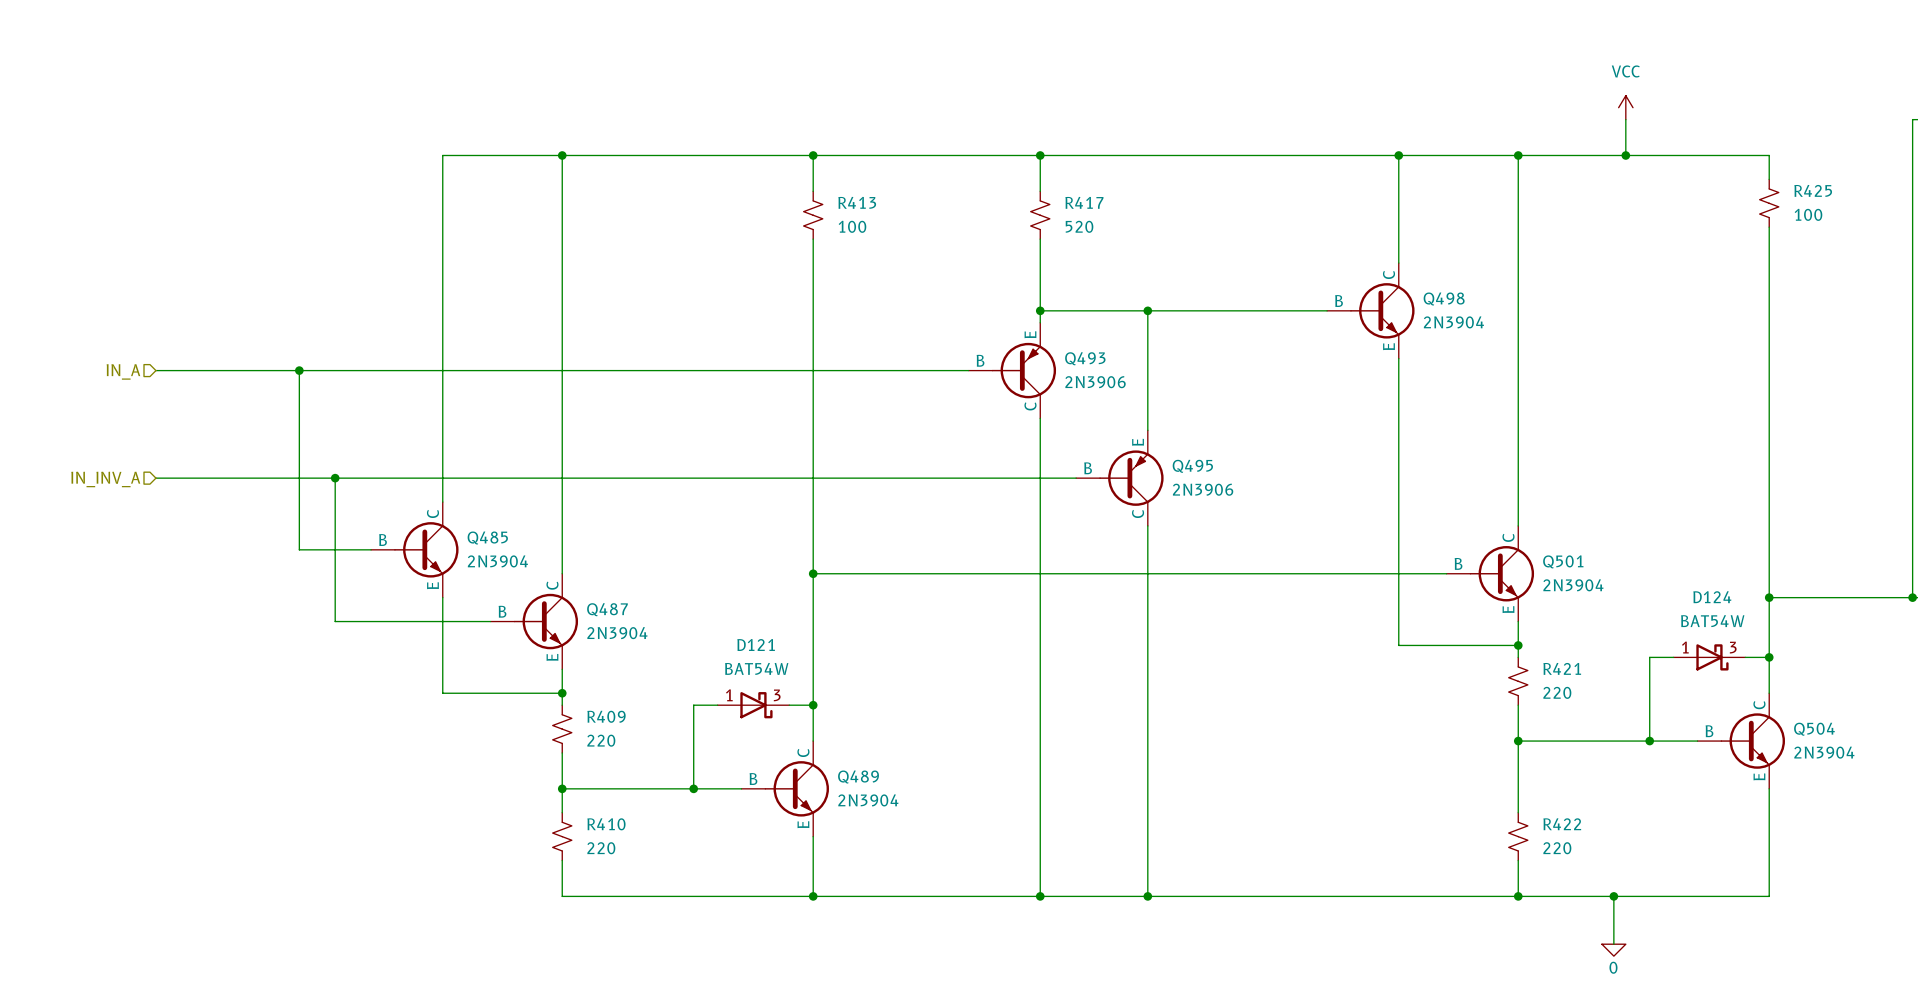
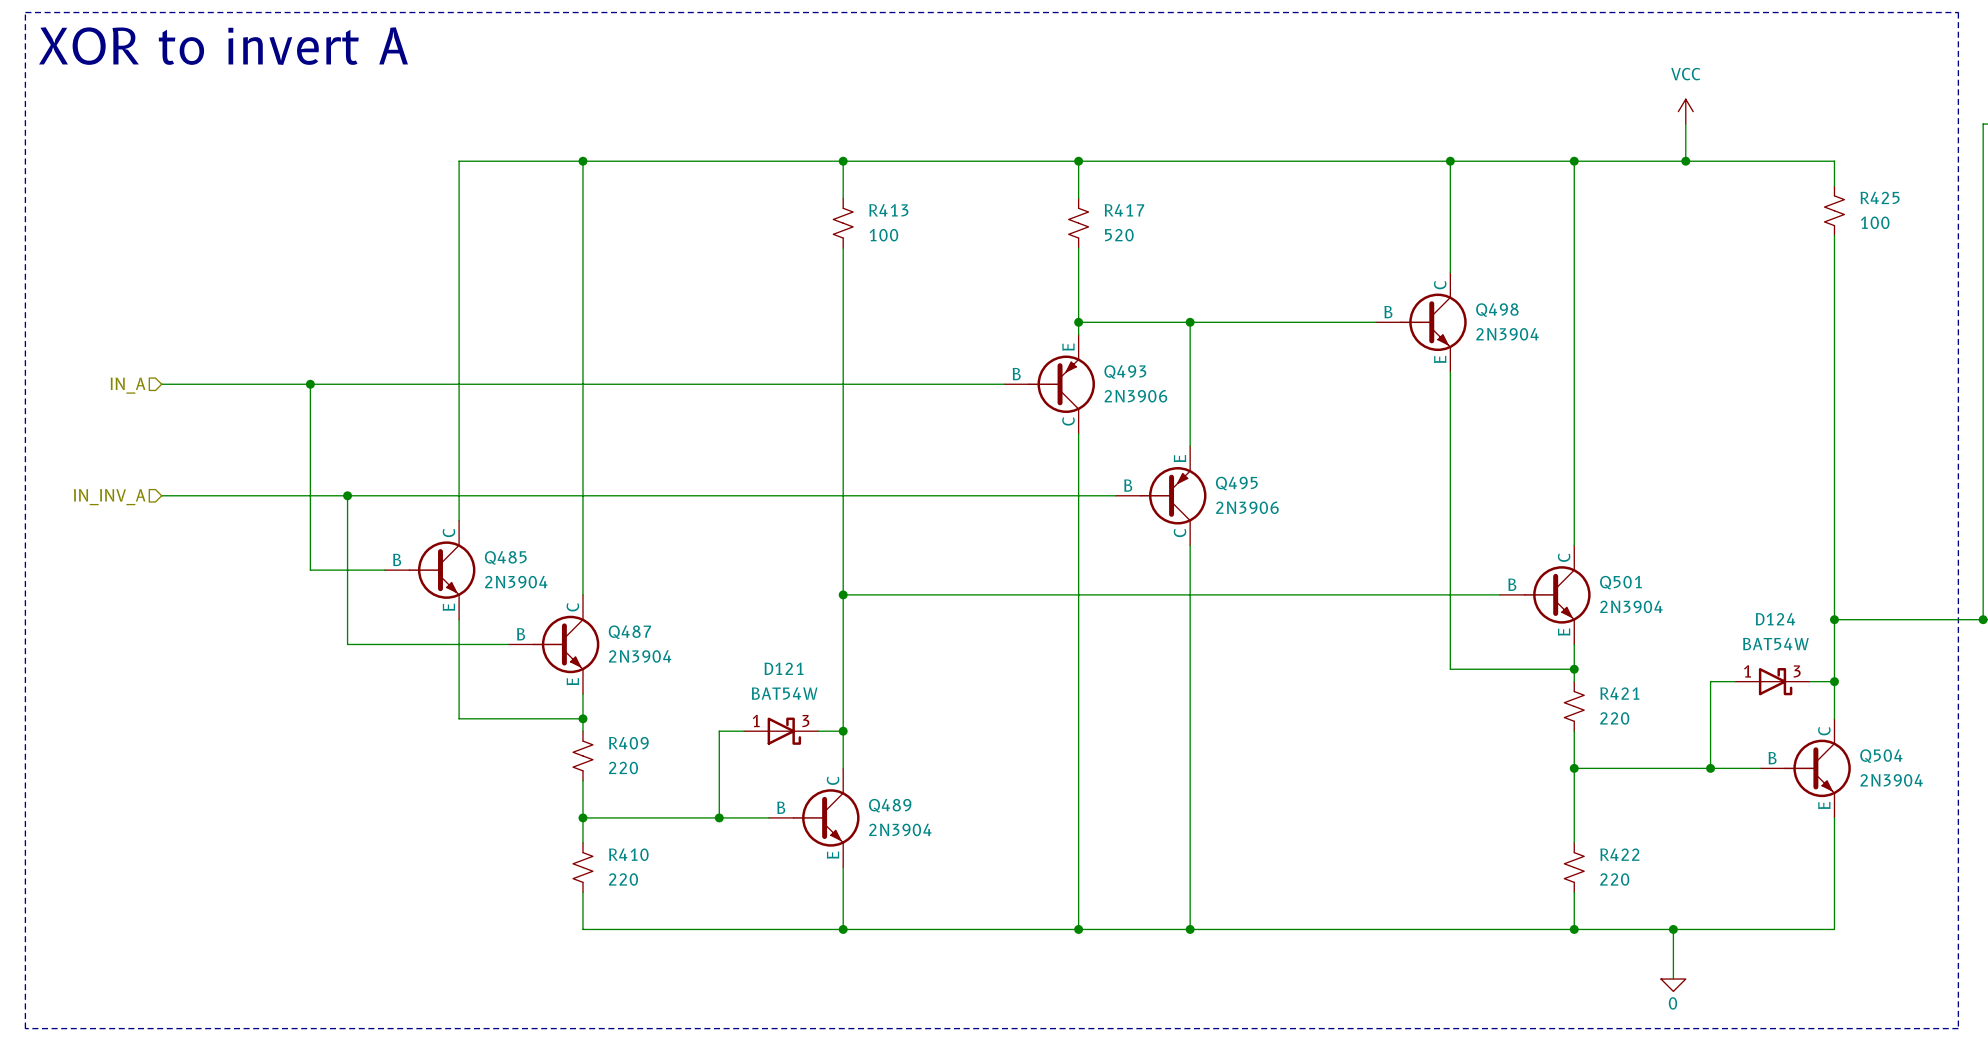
line: none -> (25, 12) (1958, 12) (1958, 1028) (25, 1028) (25, 12)
text: none -> XOR to invert A (223, 46)

